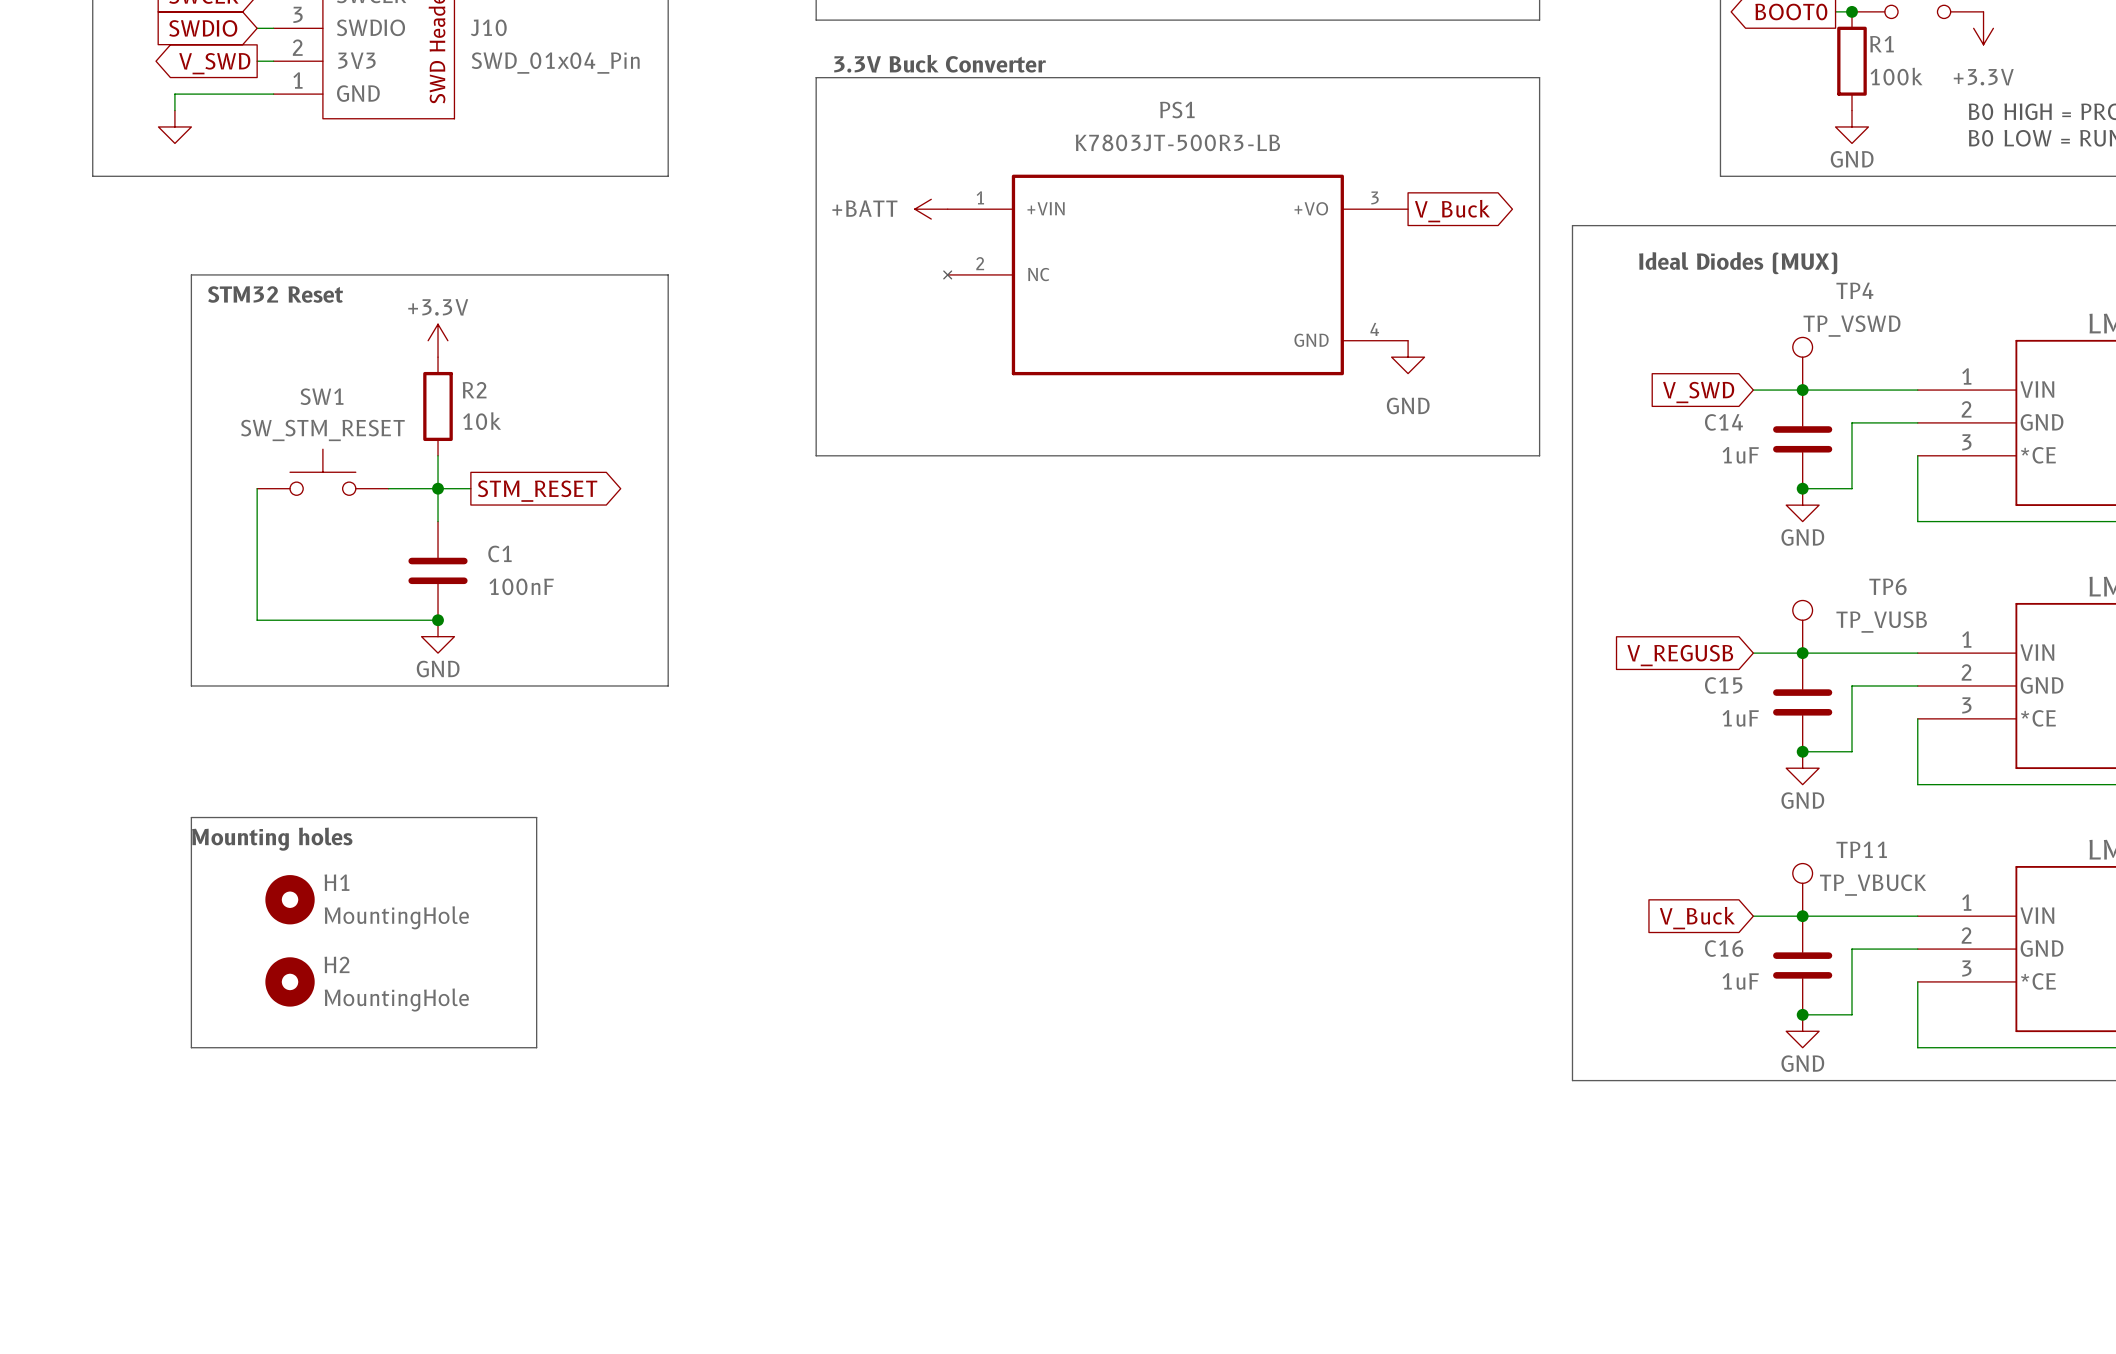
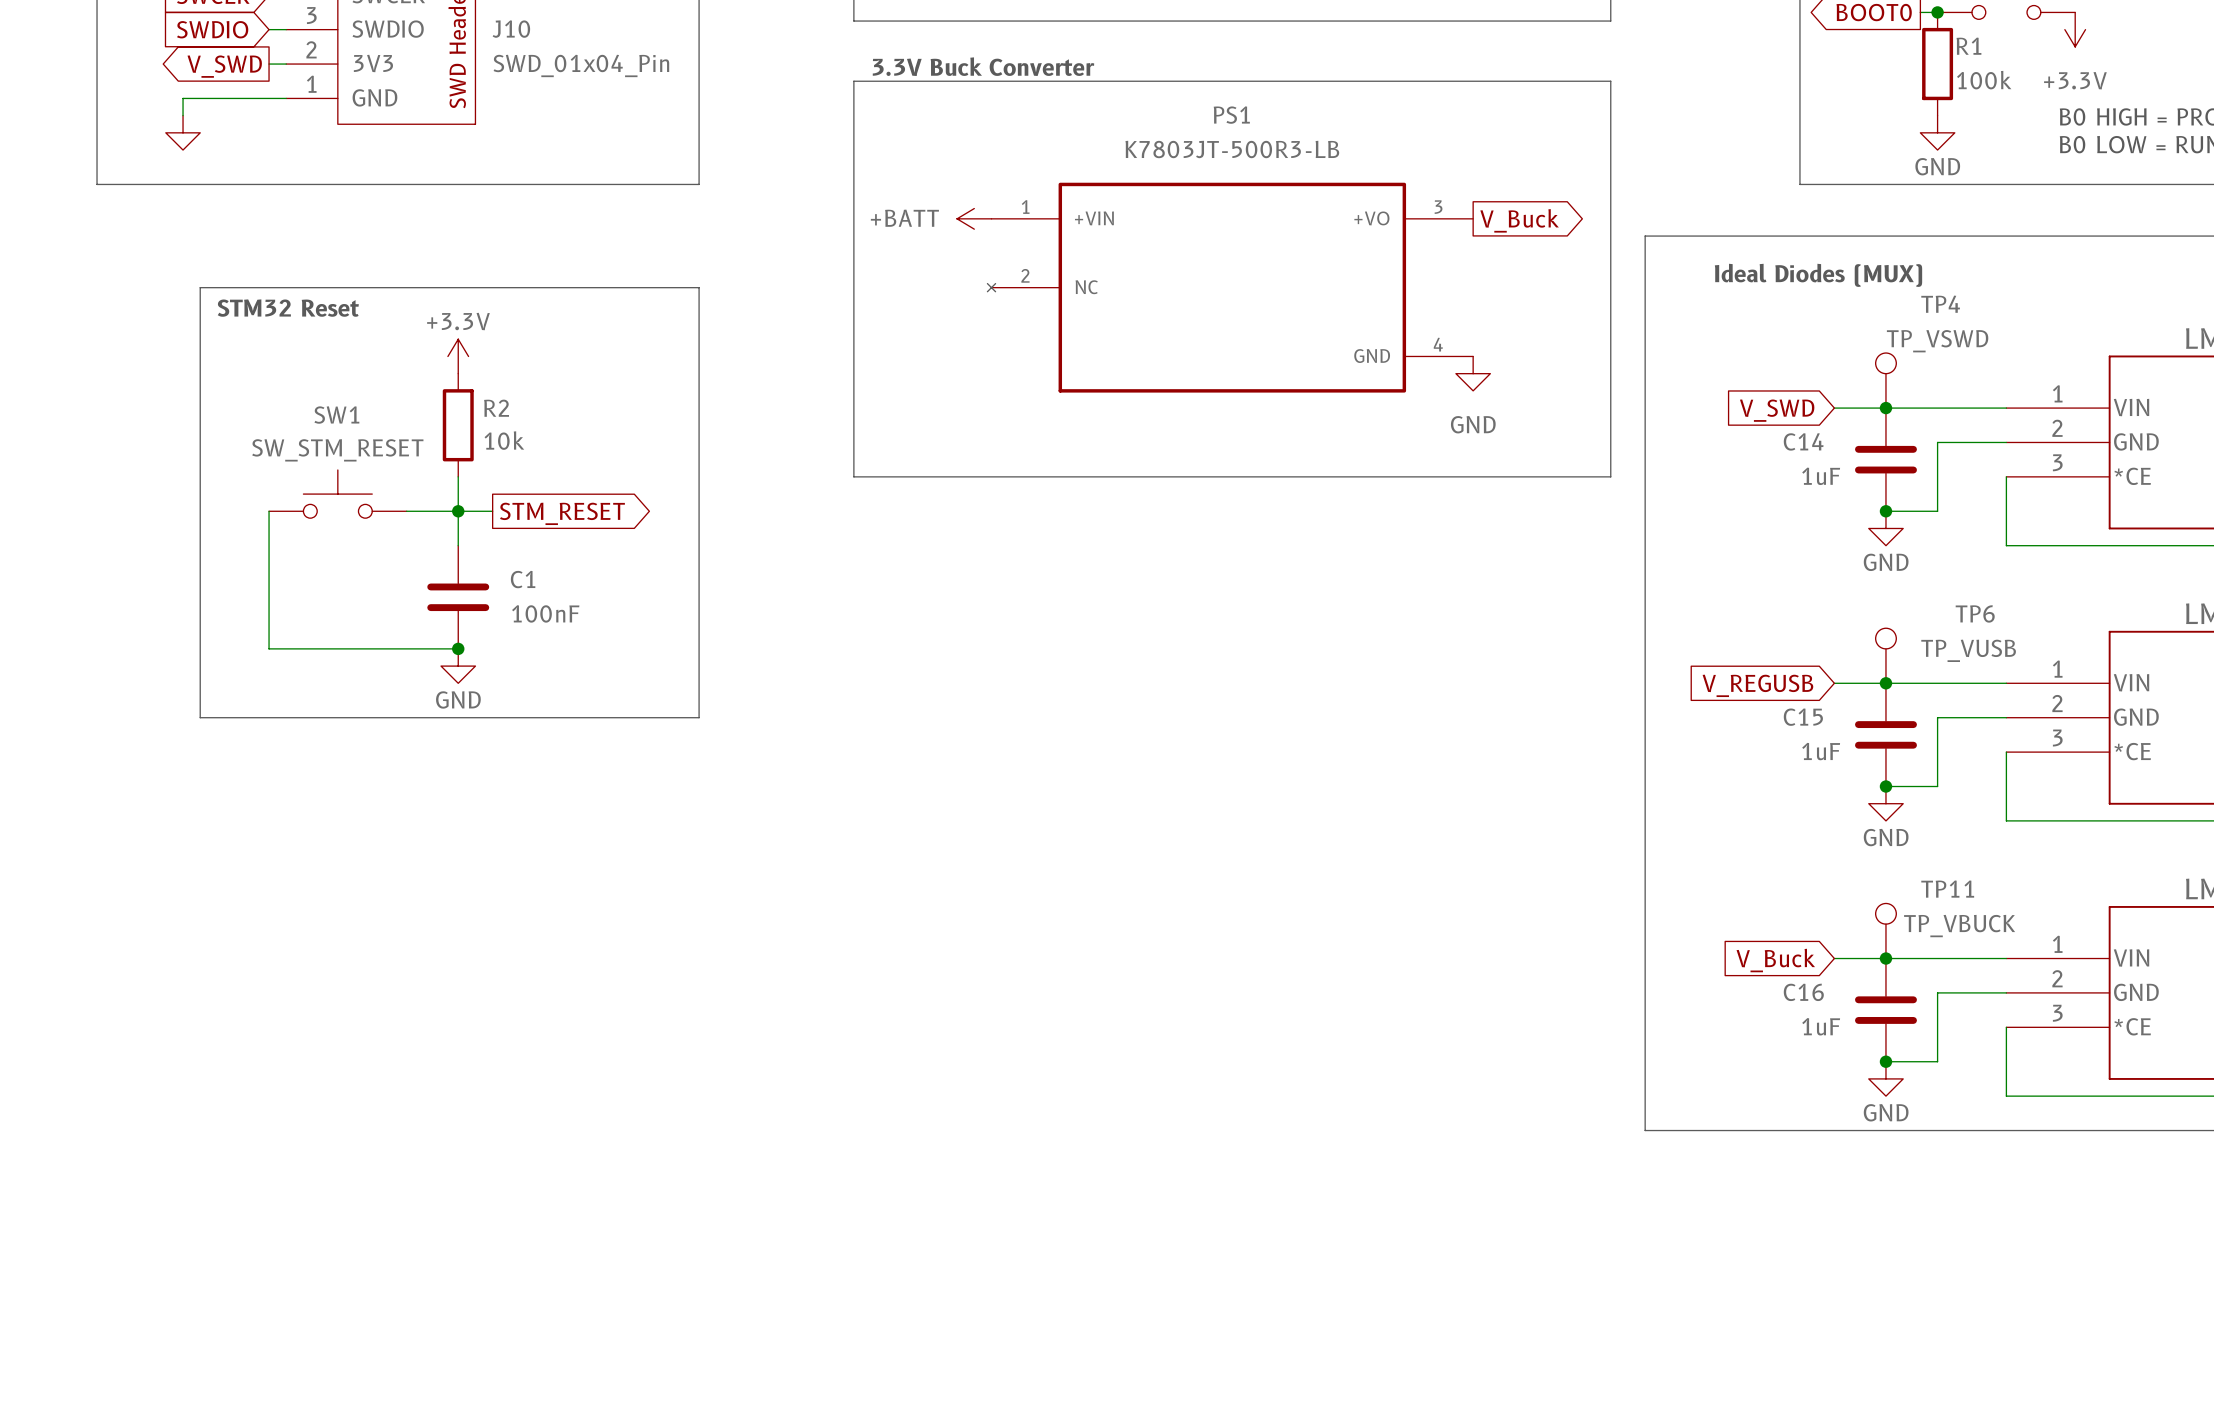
line: (191, 817) (536, 817) (536, 1047) (191, 1047) (191, 817) -> none
text: Mounting holes (272, 839) -> none
H1: MountingHole (290, 899) -> none
H2: MountingHole (290, 981) -> none

